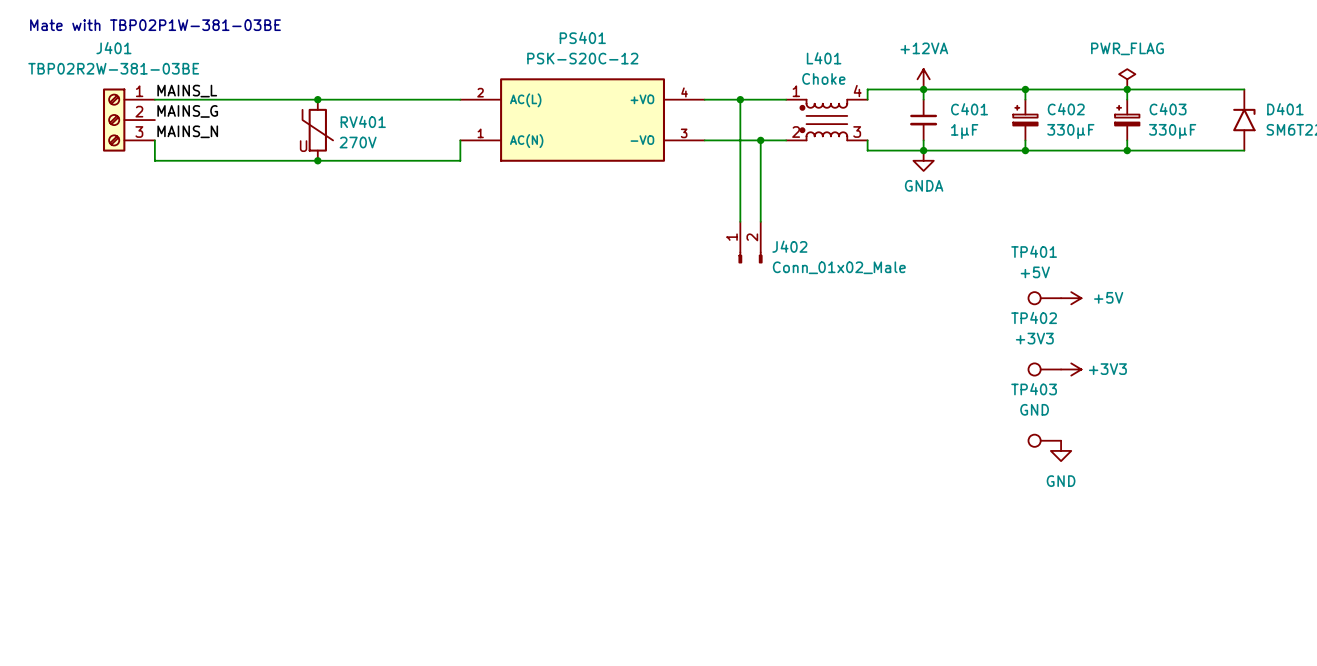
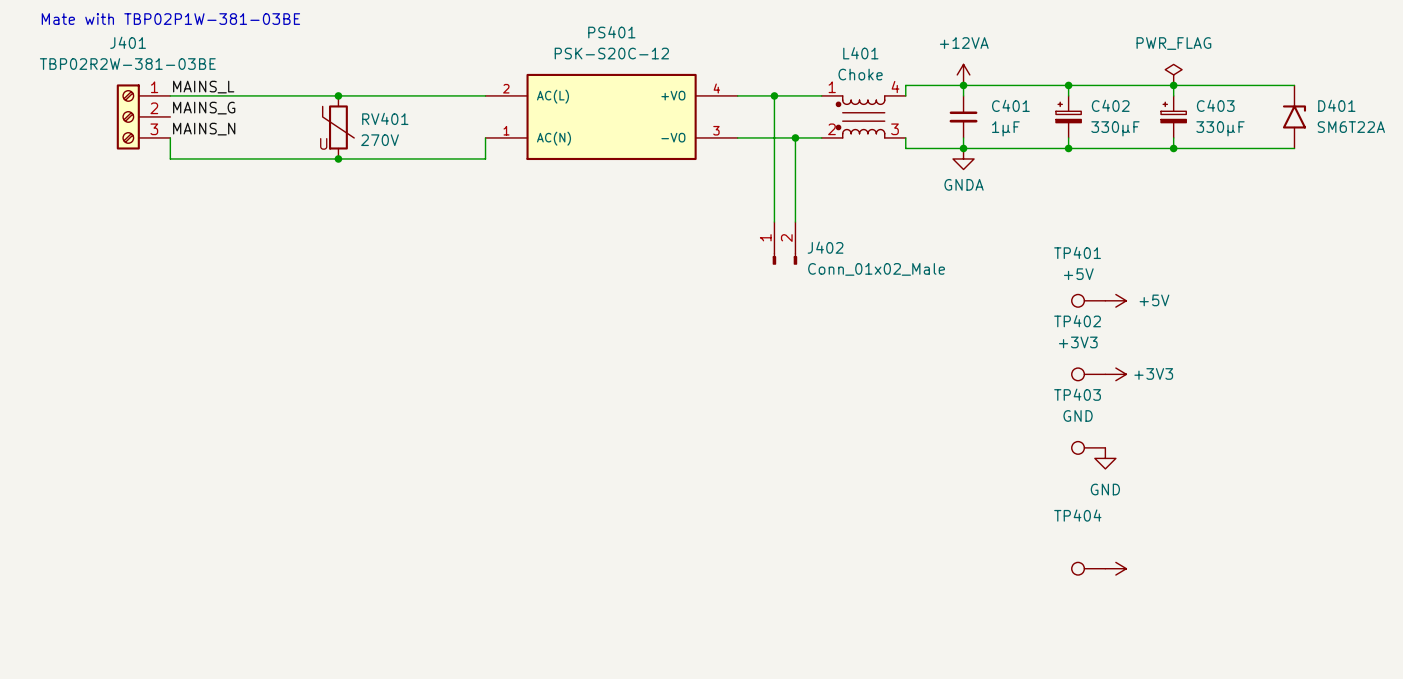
TP404: none -> (1088, 568)
power symbol: none -> (1115, 568)

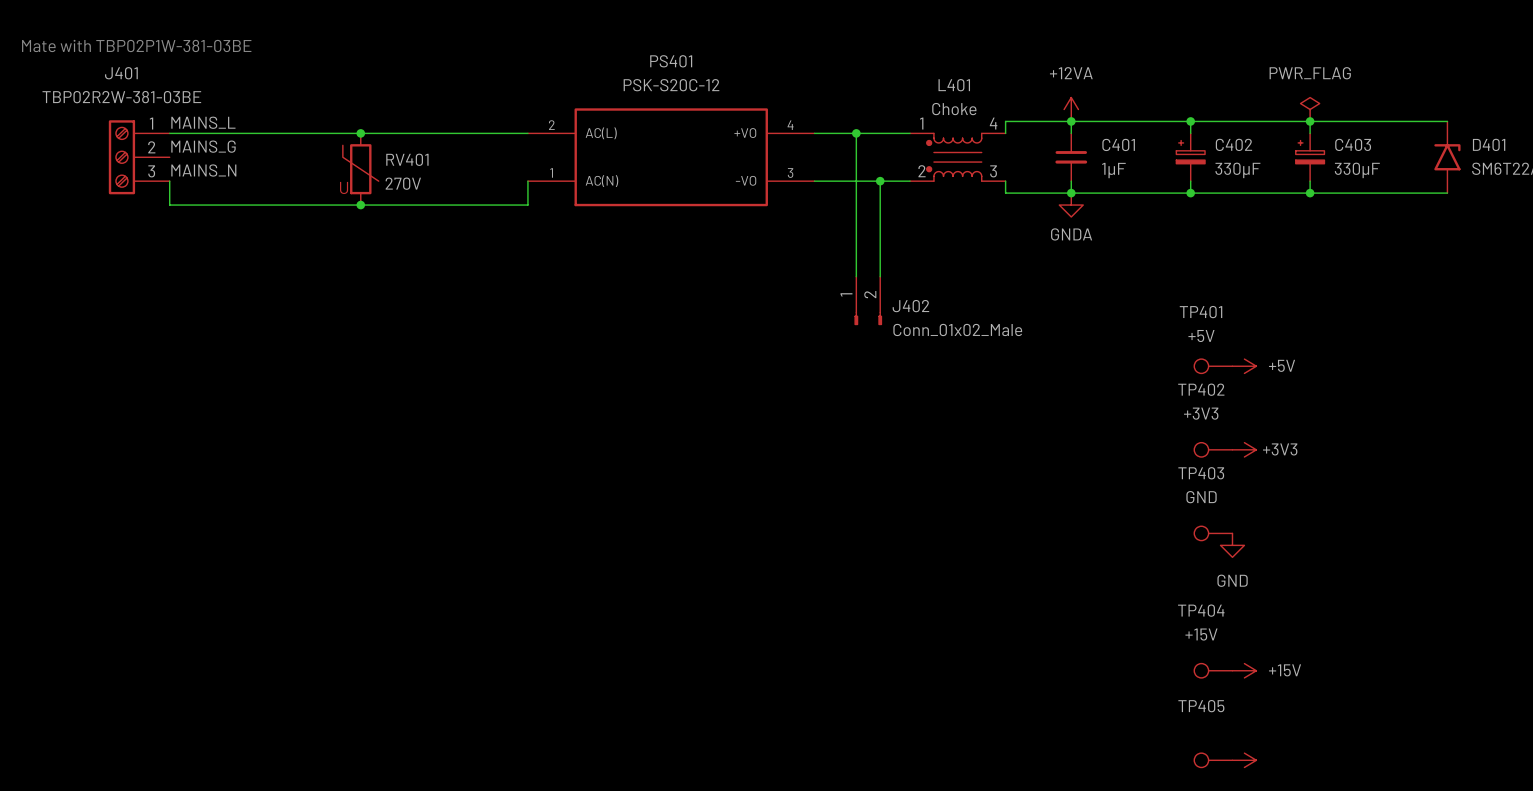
TP404 value: none -> +15V (1201, 634)
power symbol text: none -> +15V (1285, 670)
TP405: none -> (1213, 760)
power symbol: none -> (1244, 760)

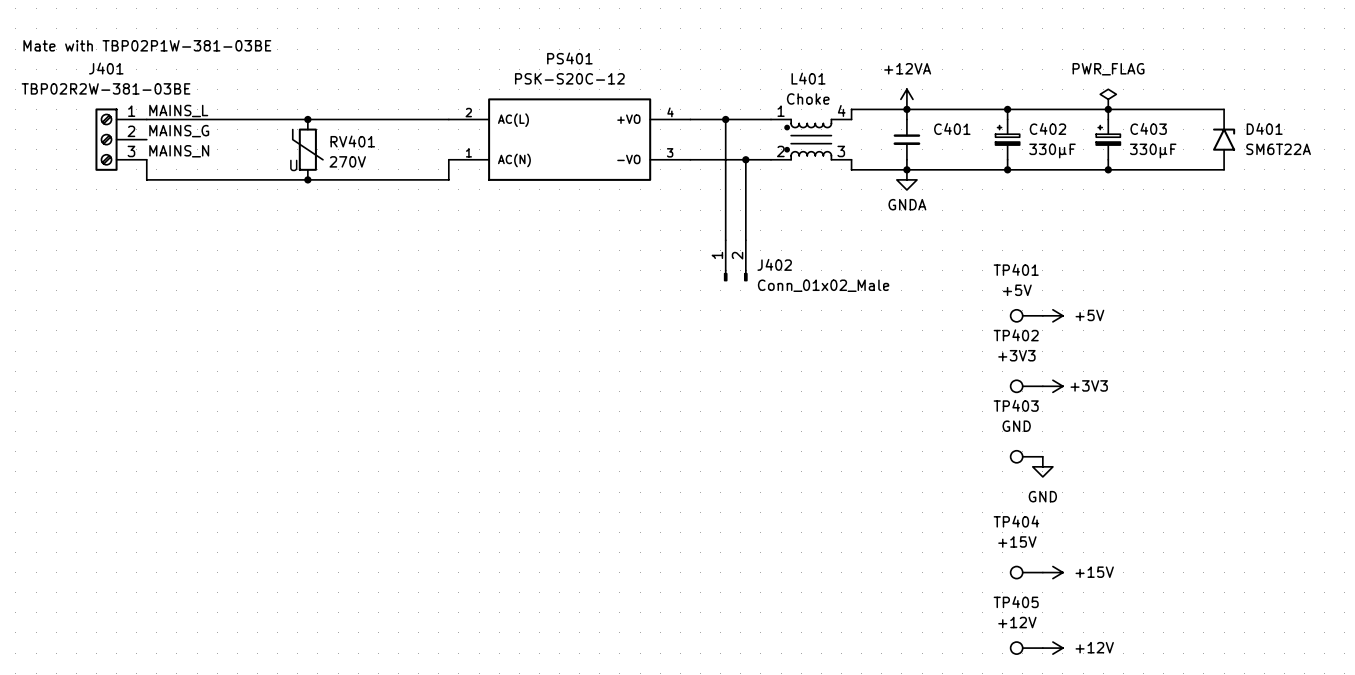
C401 value: 1µF (1113, 170) -> none
TP405 value: none -> +12V (1017, 622)
power symbol text: none -> +12V (1094, 647)

